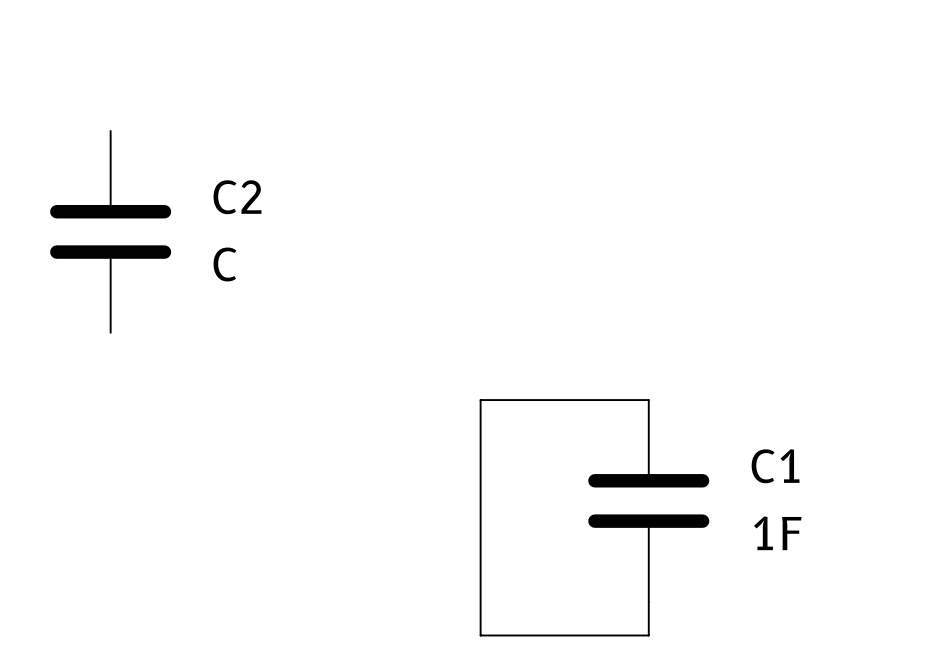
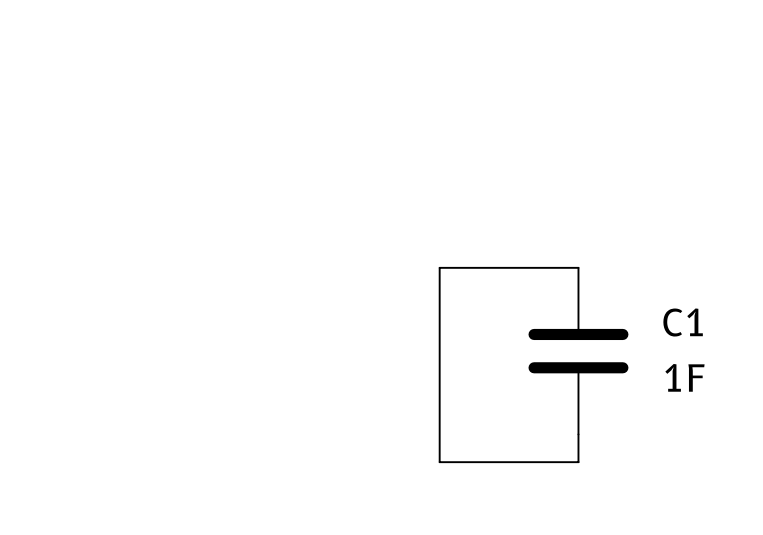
C2: C (110, 231) -> none

